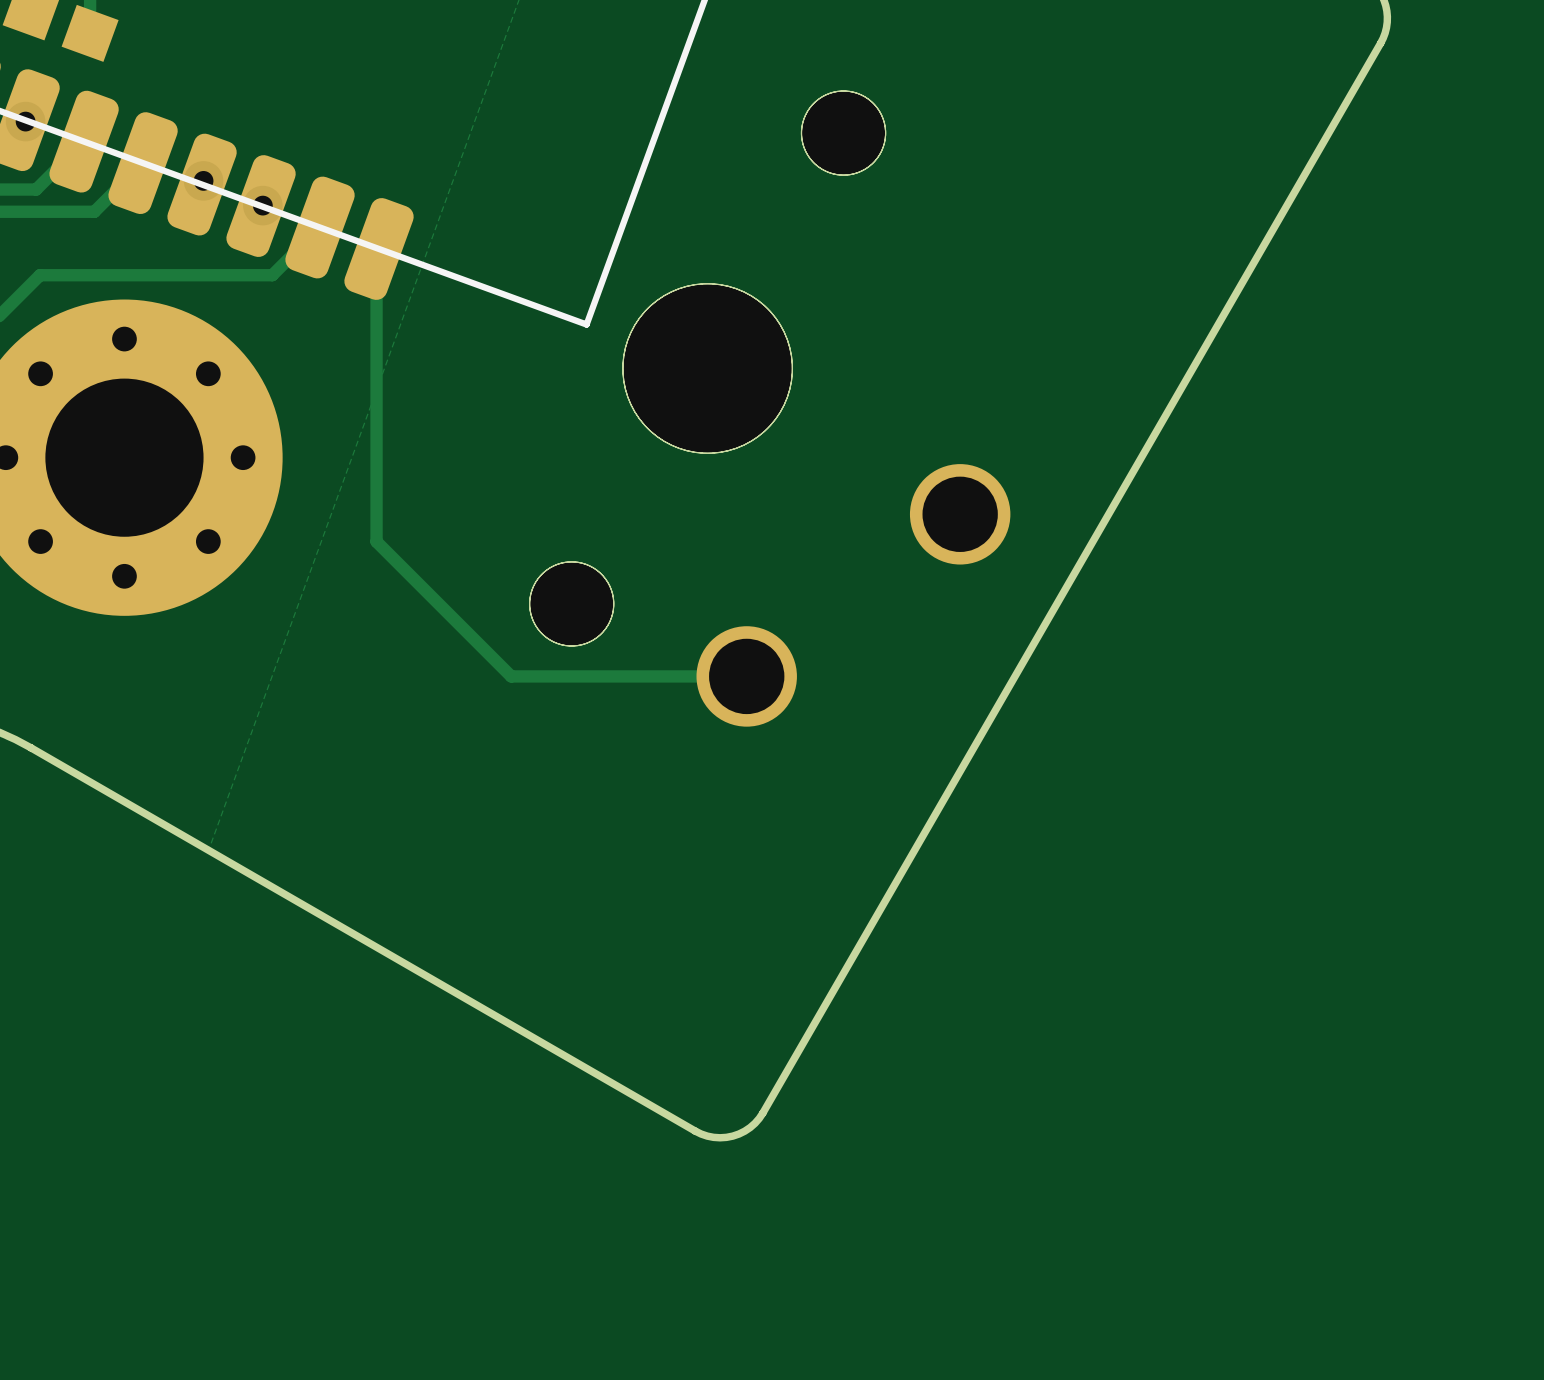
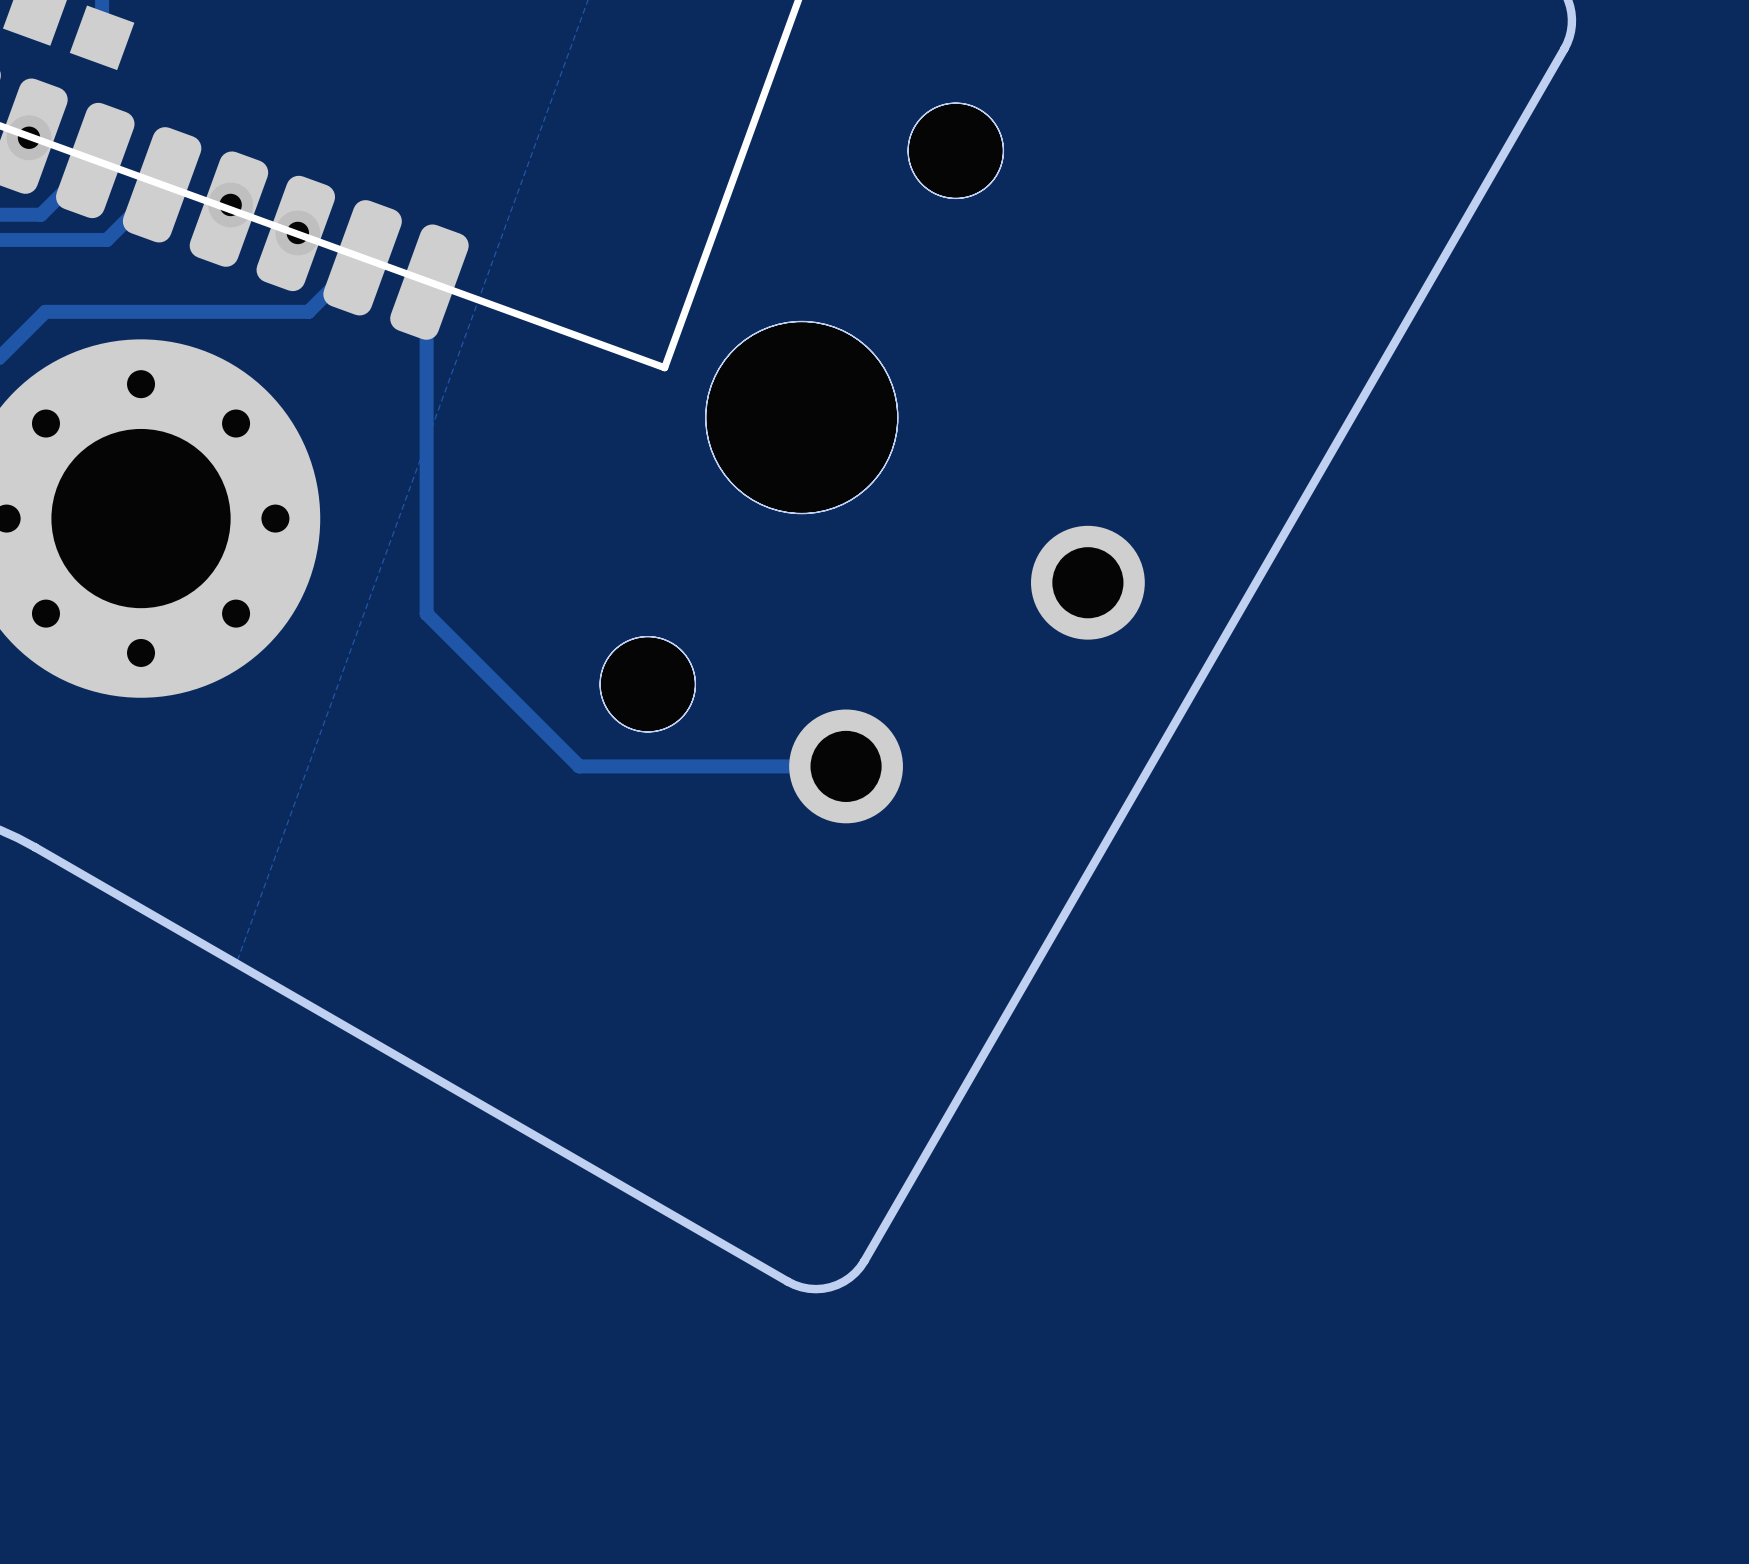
part footprint: [529, 91, 1011, 727] -> [600, 103, 1145, 824]

